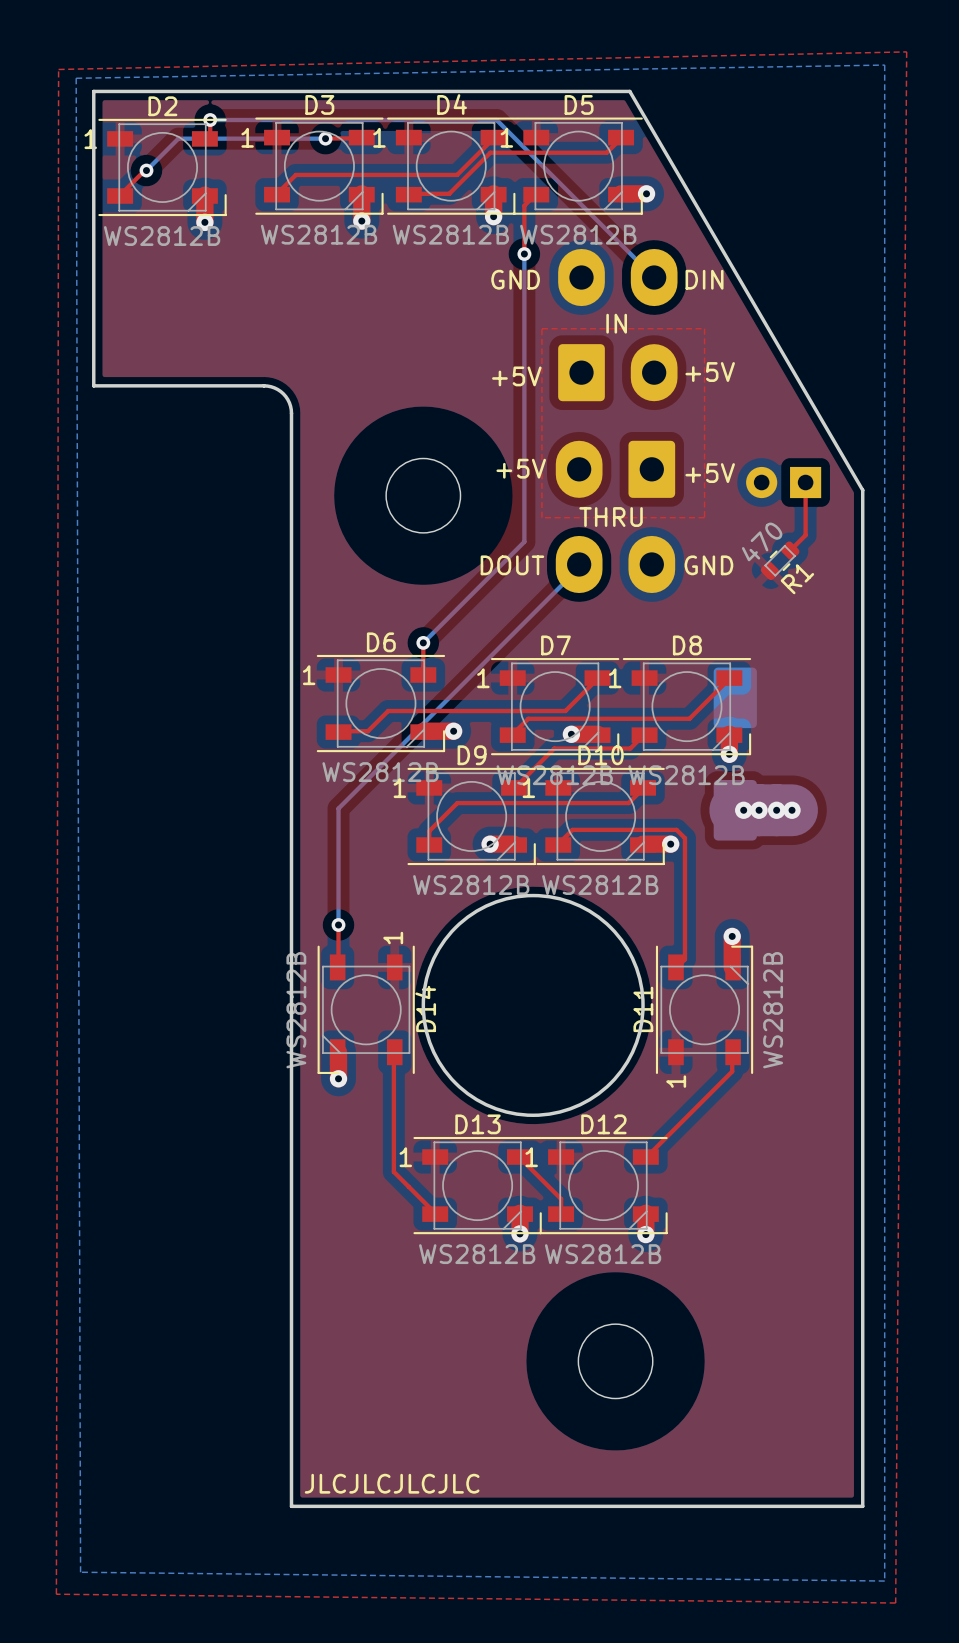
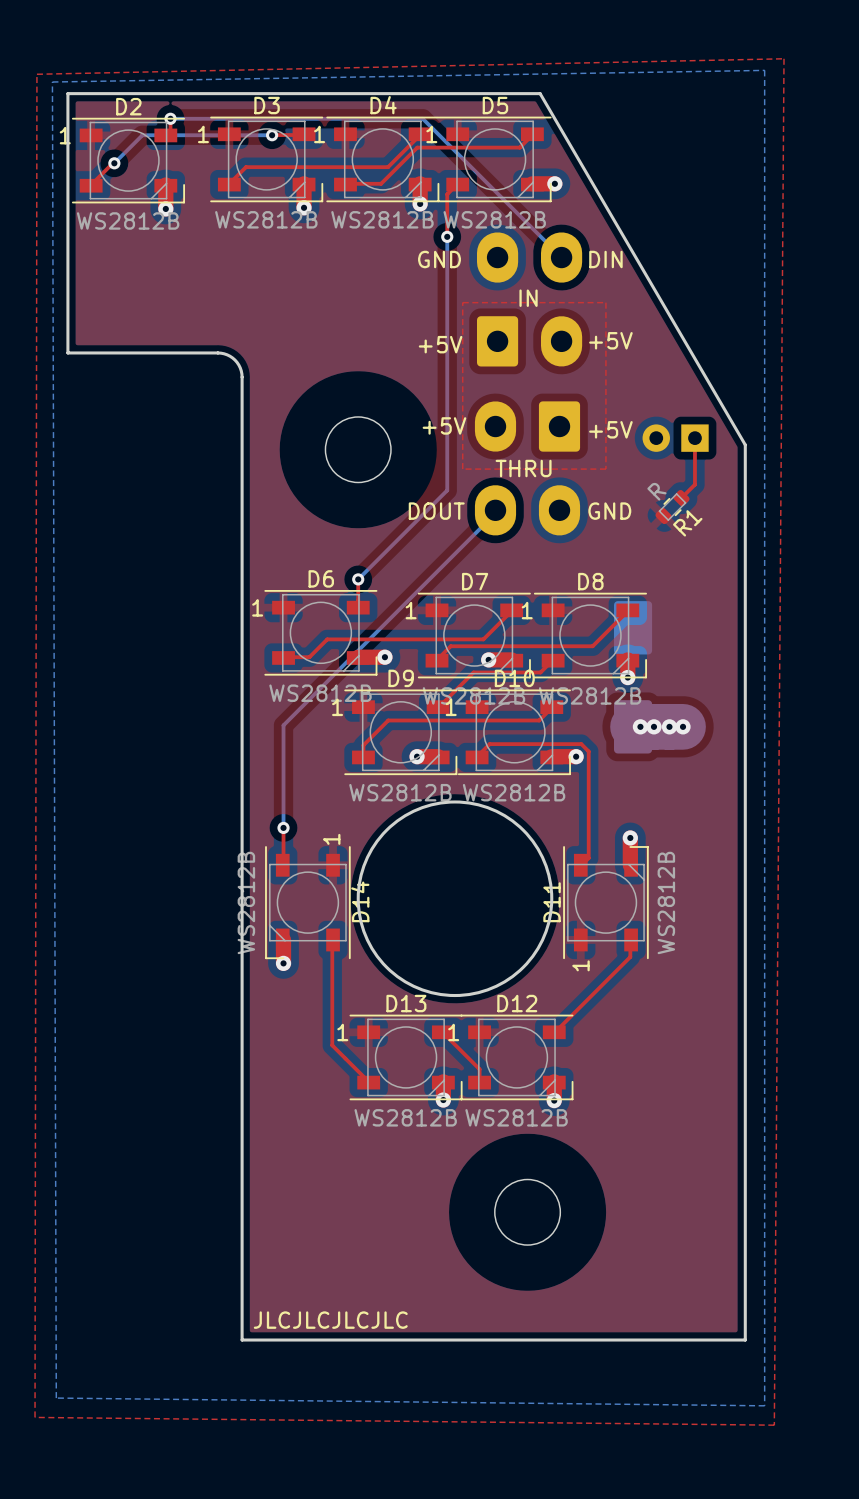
R1 value: 470 (762, 541) -> R (656, 491)

